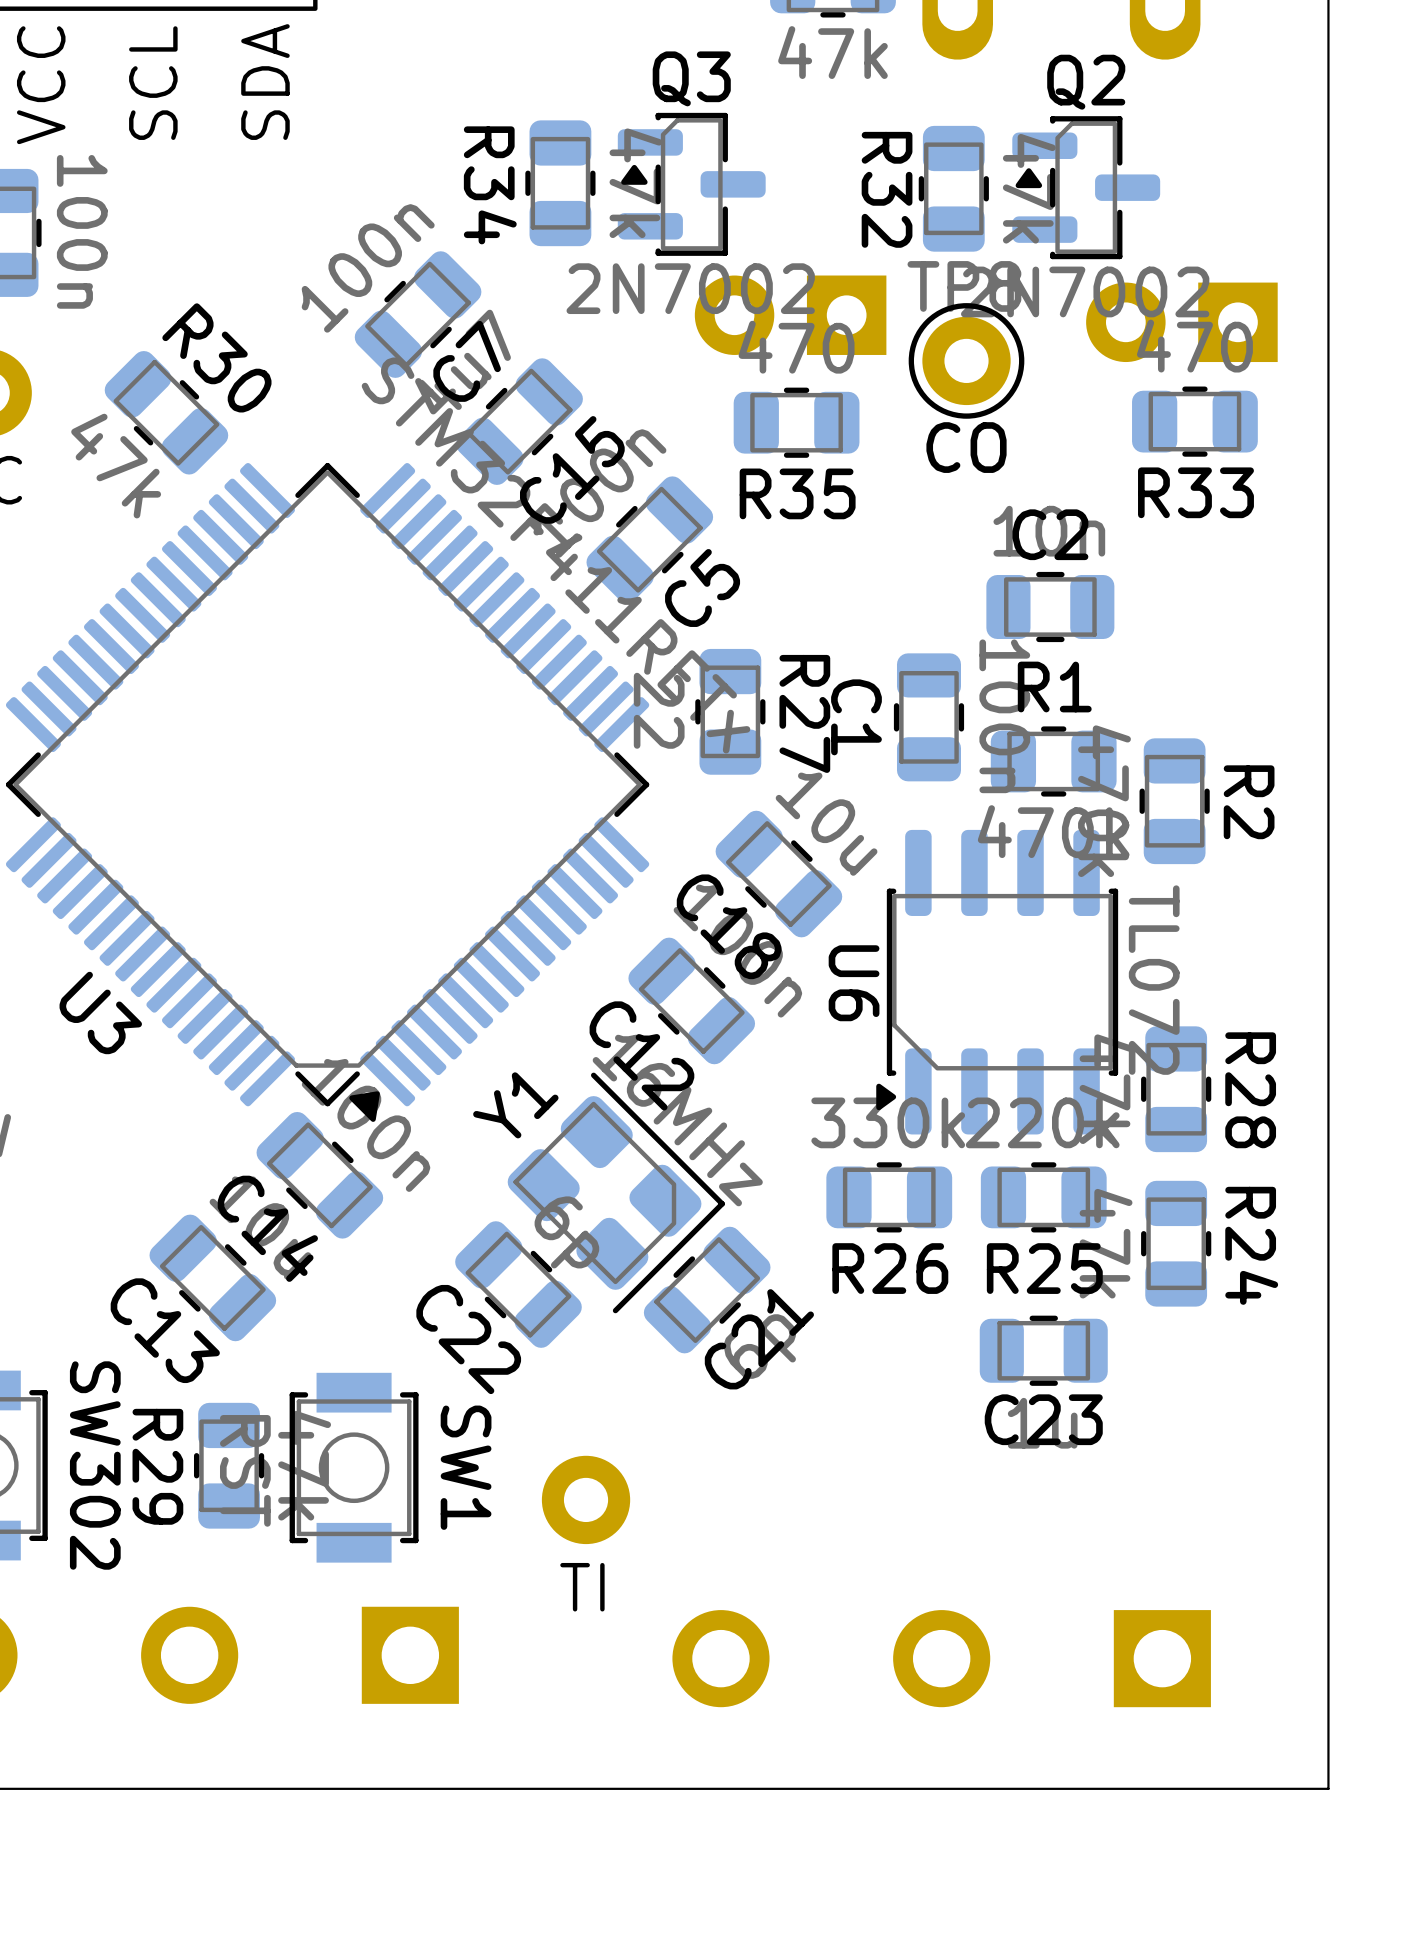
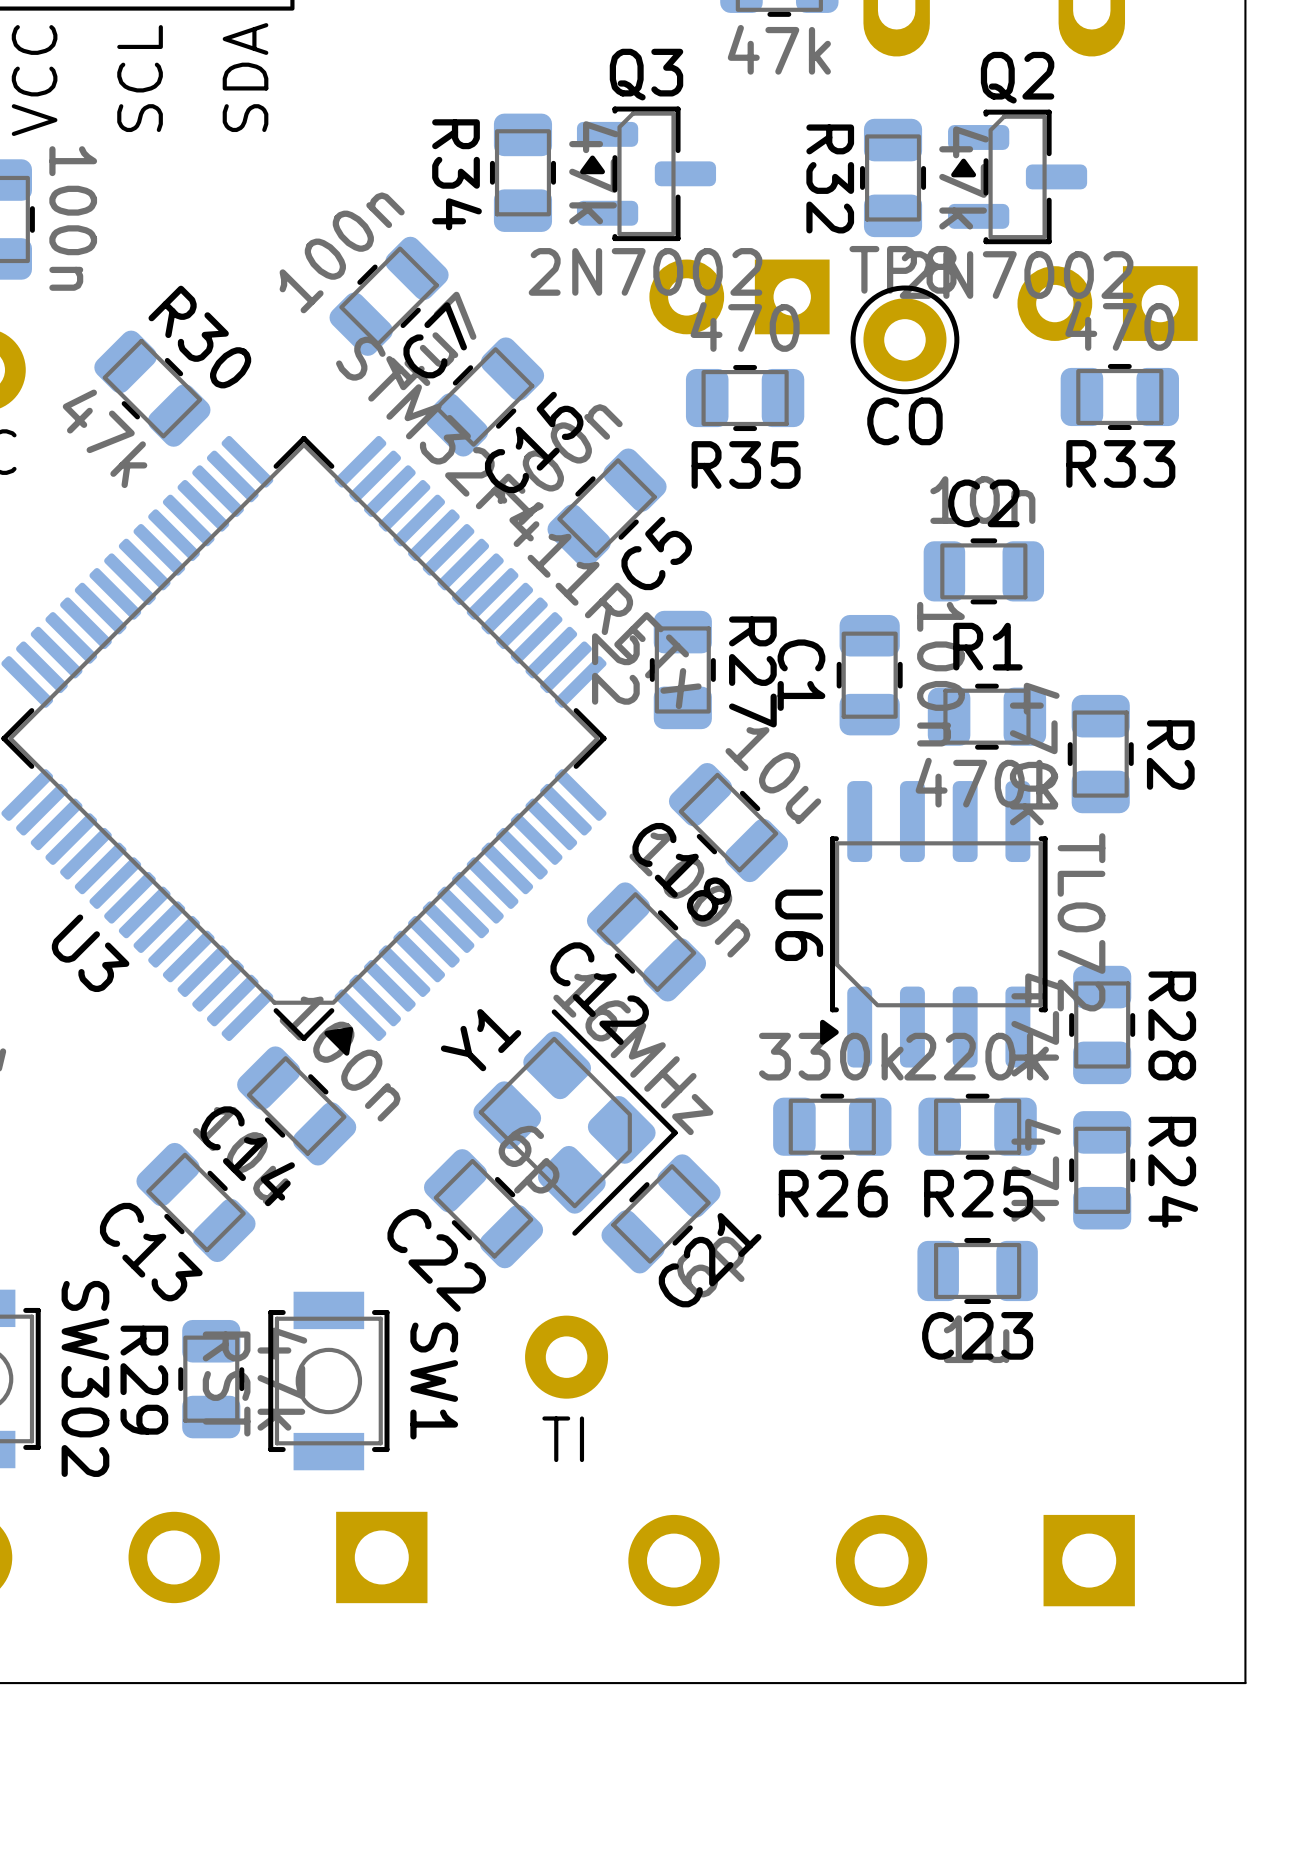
part position: (586, 1499) -> (566, 1357)

